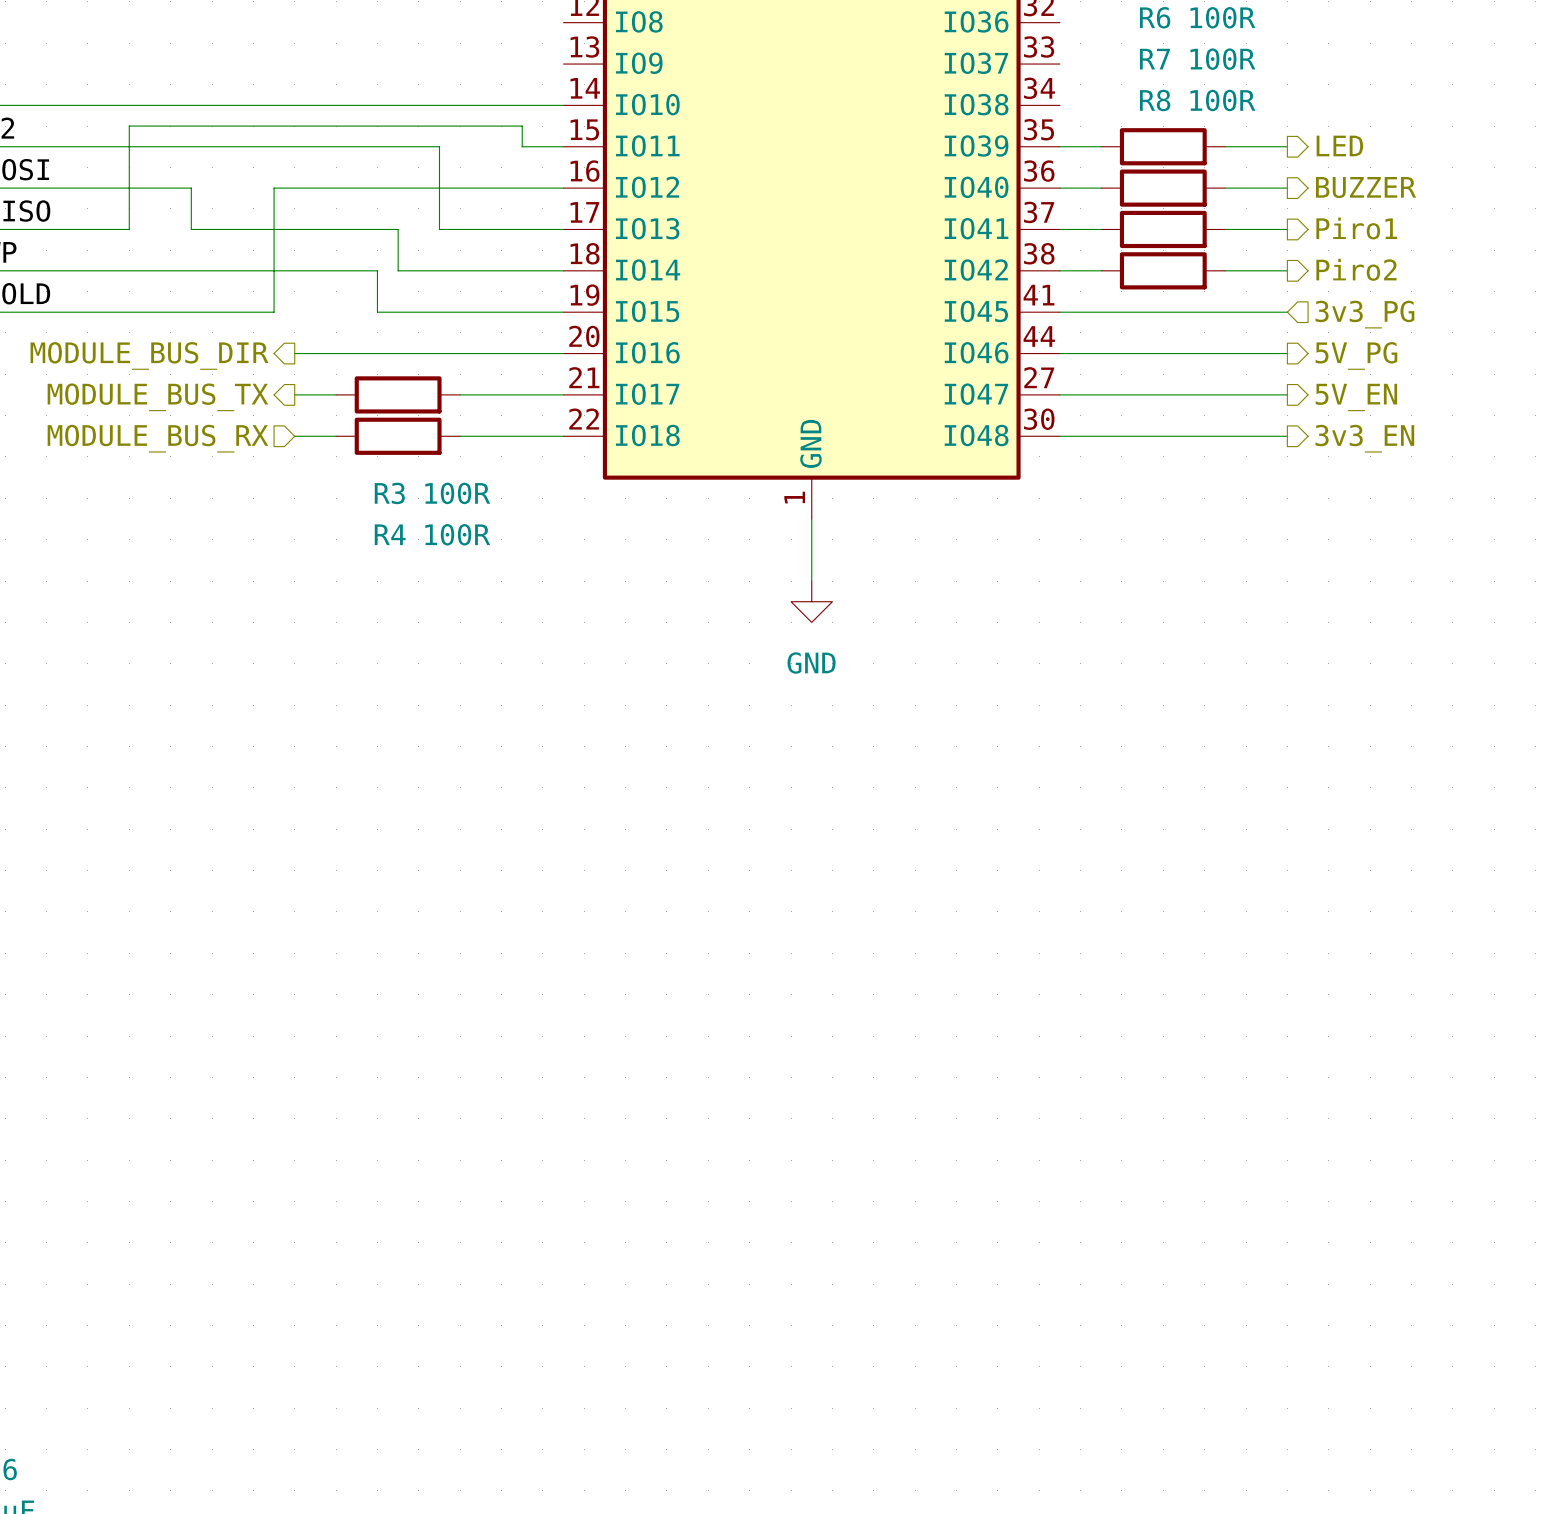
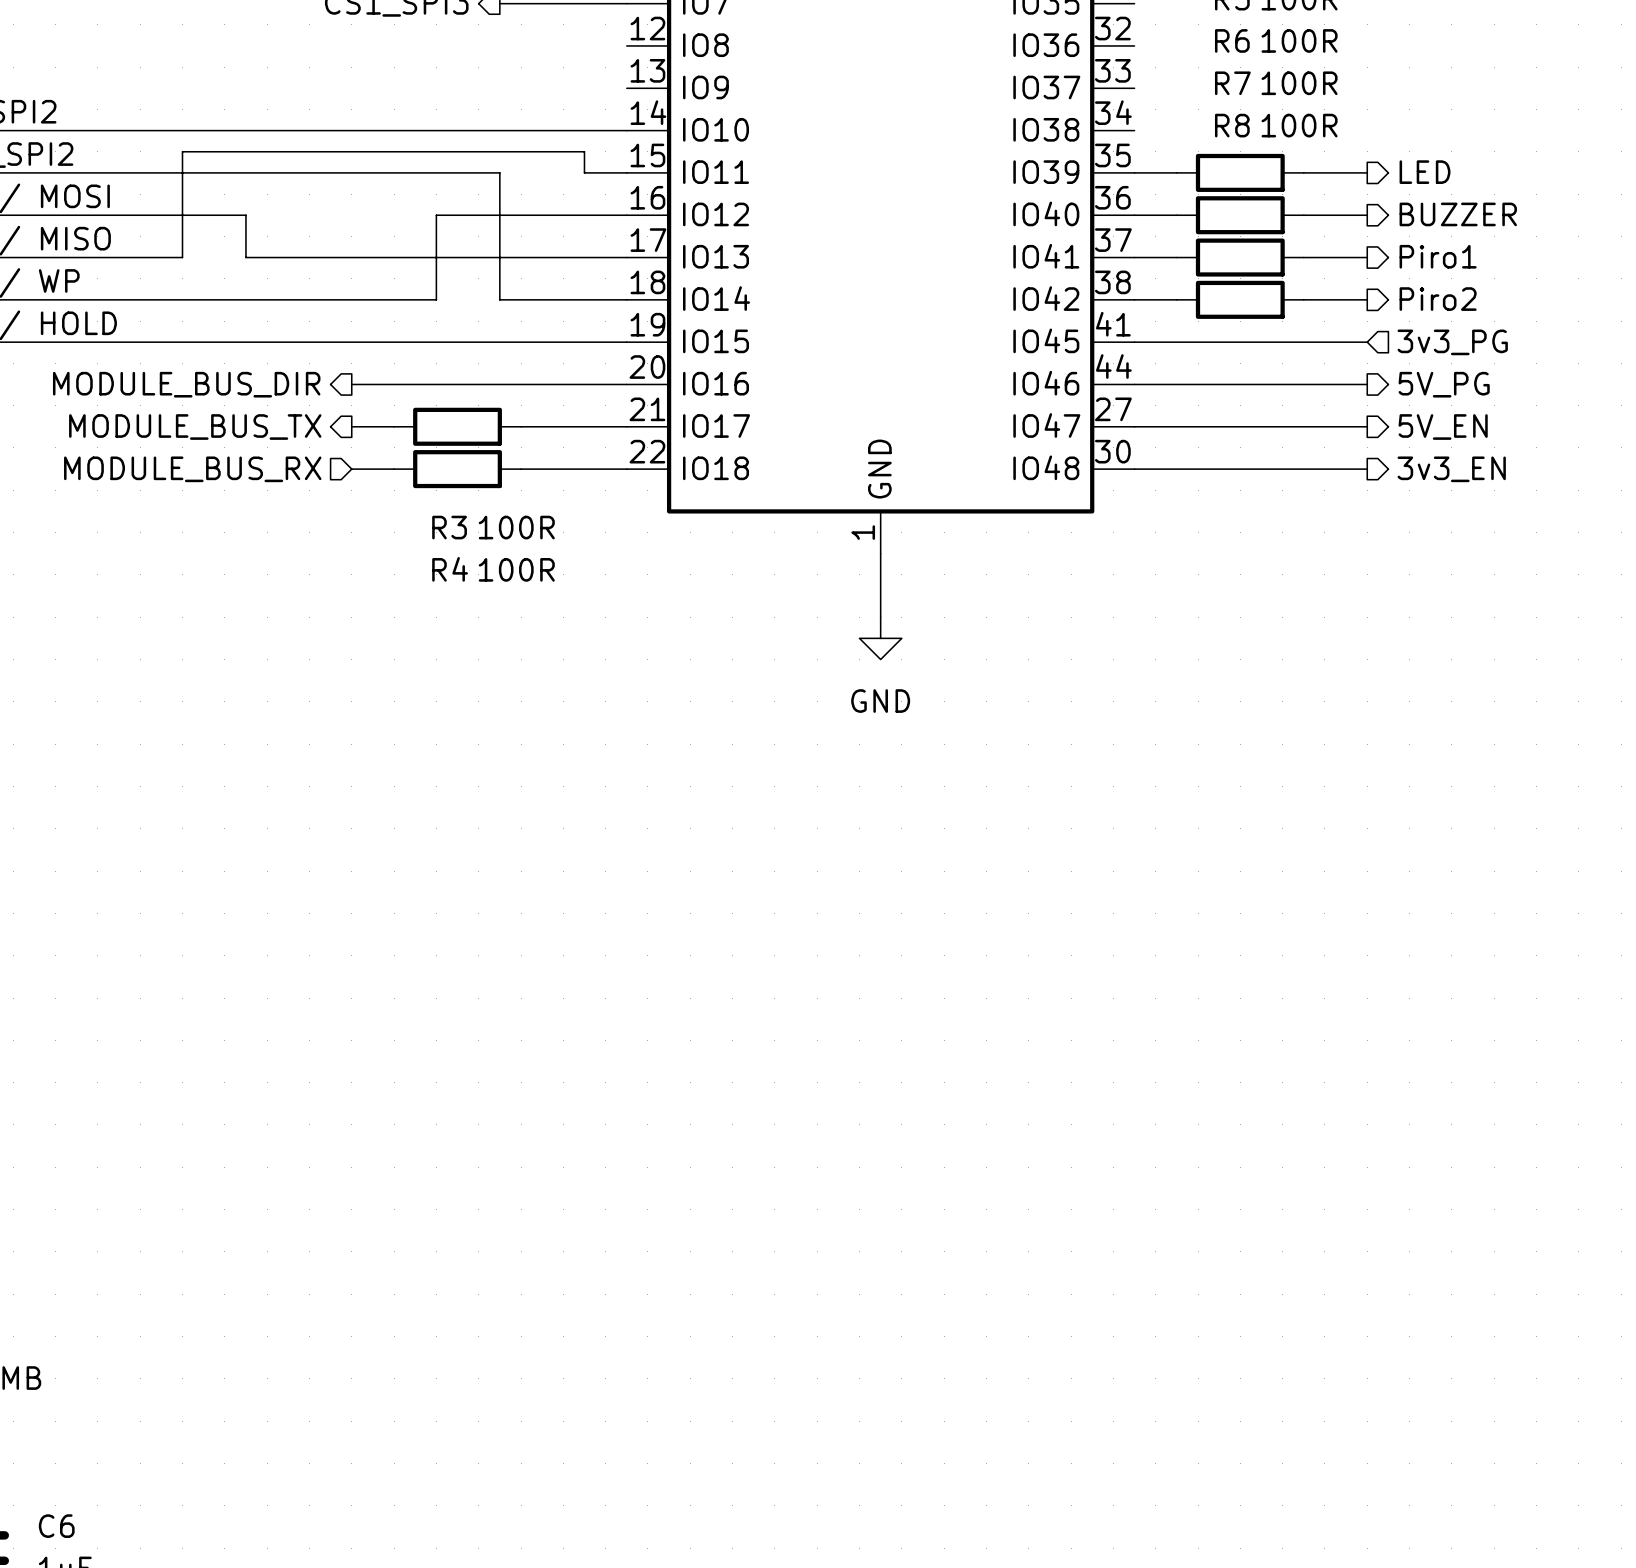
wire: (377, 188) (274, 188) (274, 312) -> (436, 215) (436, 299)
wire: (398, 229) (398, 270) (439, 270) -> (457, 257) (499, 257) (499, 299)
wire: (377, 270) (377, 312) -> (330, 342) (436, 342)

